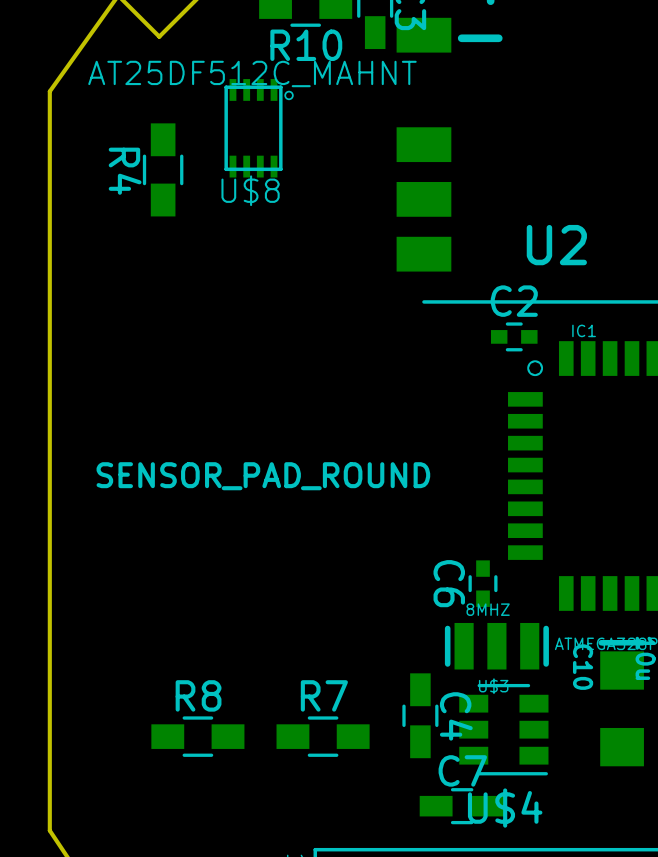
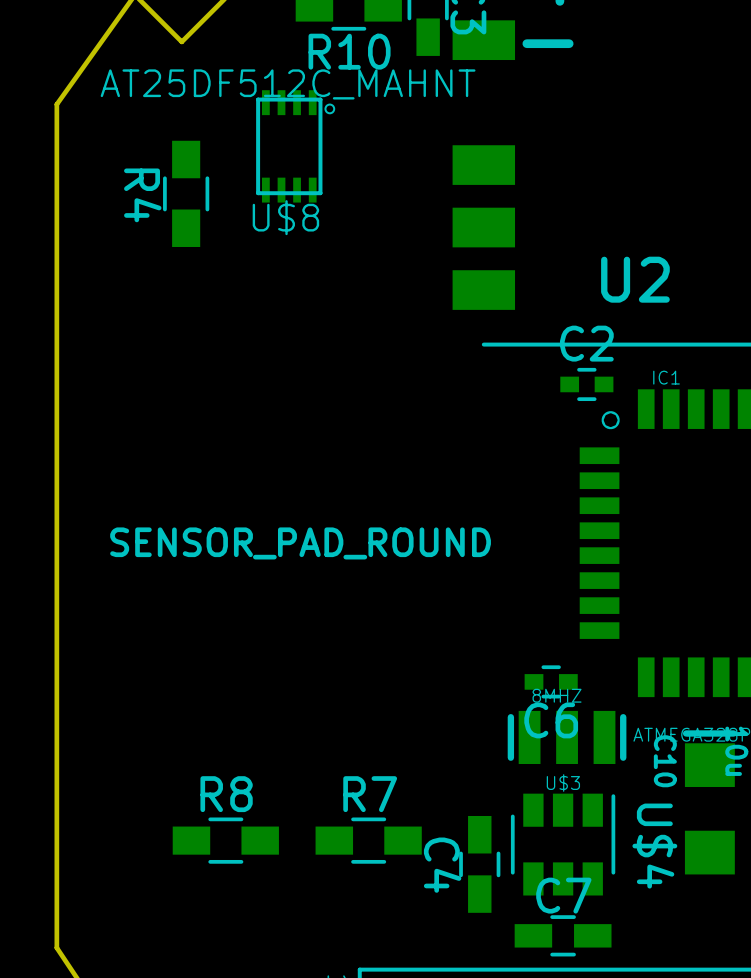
C6 rotation: 0° (483, 583) -> 90° clockwise (551, 681)
C4 position: (420, 715) -> (479, 864)
C4 name position: C4 (456, 716) -> C4 (442, 865)
U$4 rotation: 0° (503, 729) -> 90° counterclockwise (563, 844)
C7 position: (462, 806) -> (563, 935)

